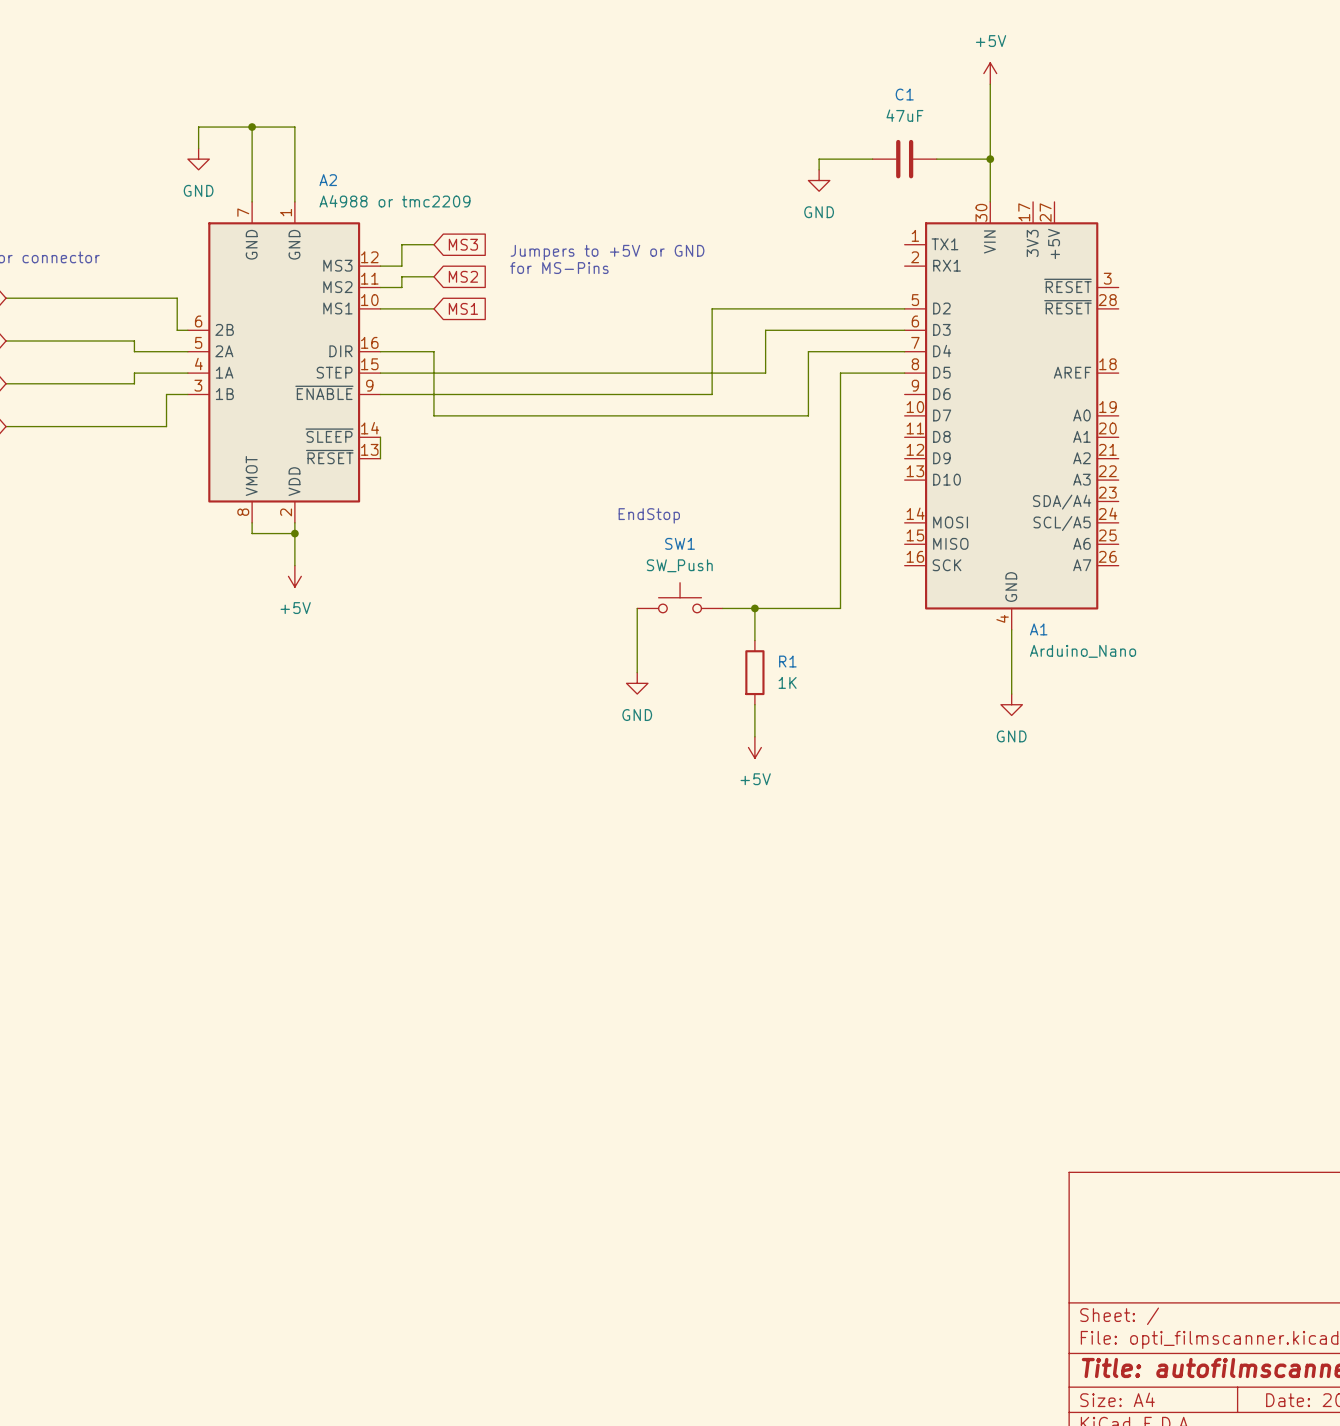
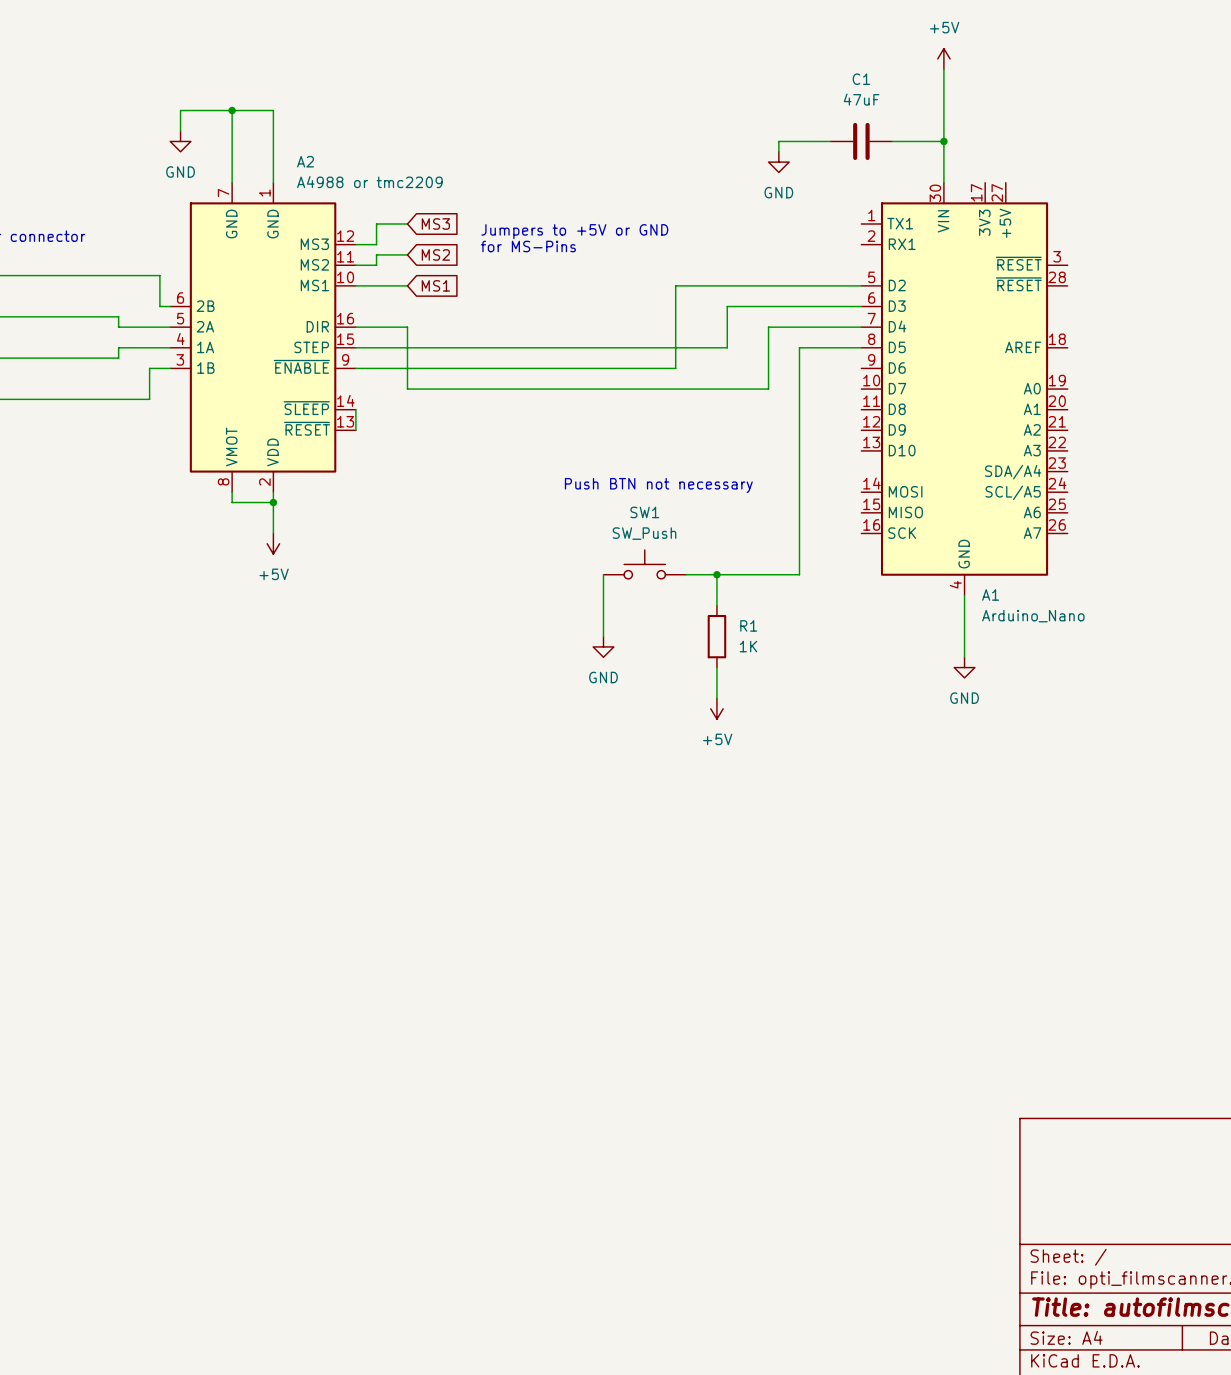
text: EndStop (649, 515) -> none
text: none -> Push BTN not necessary (658, 485)

